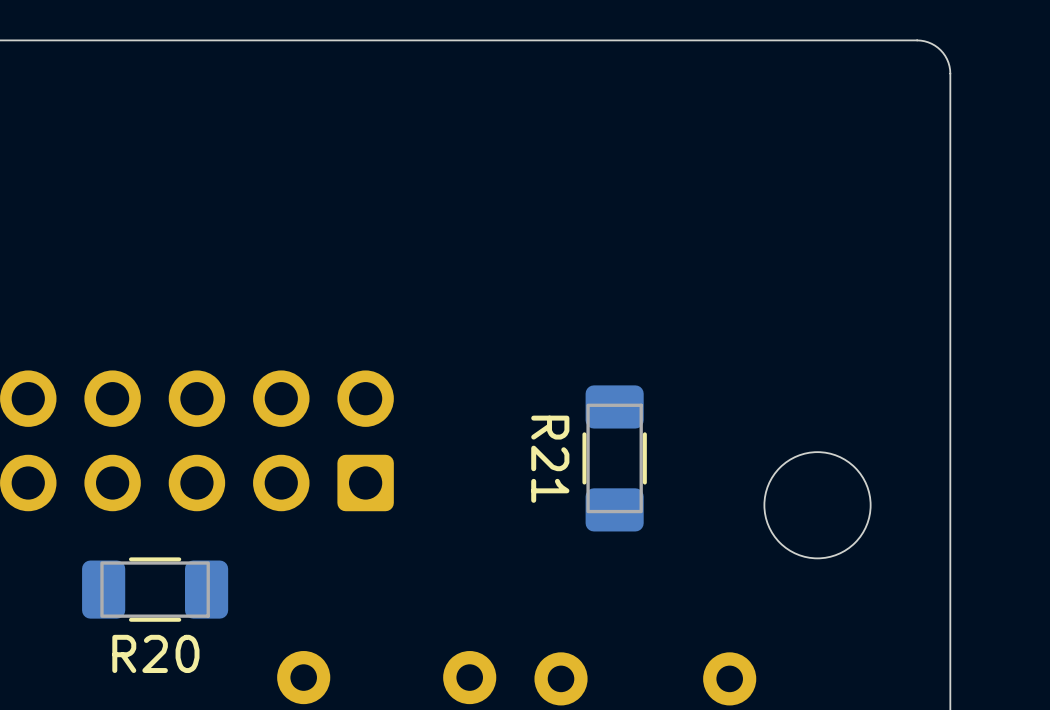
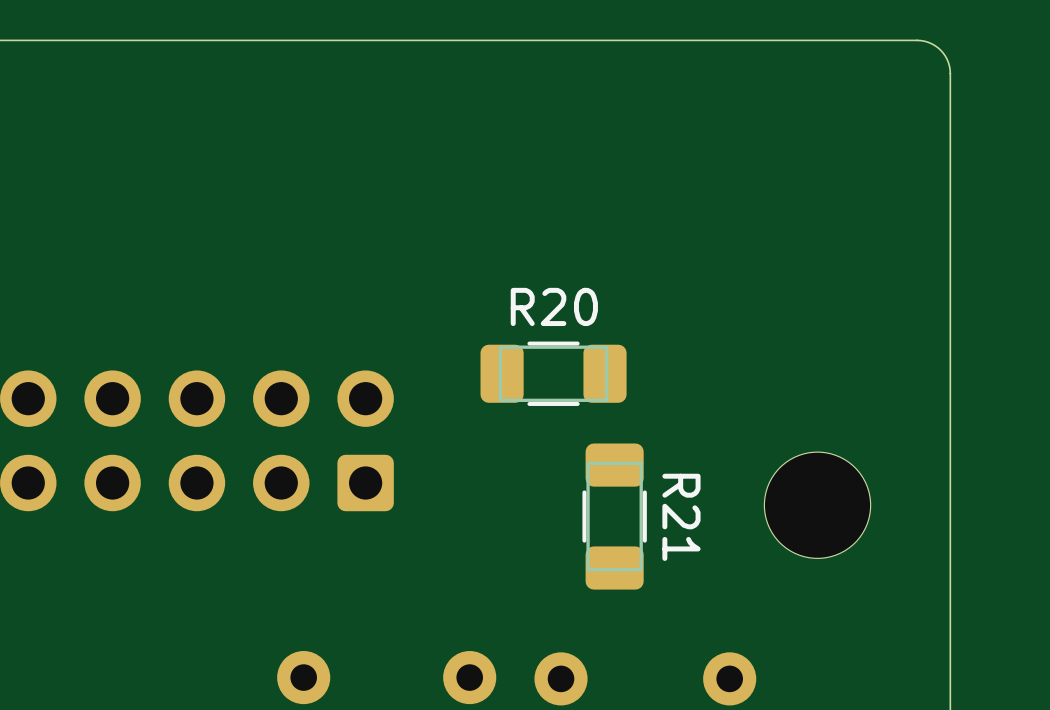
R21 position: (614, 458) -> (614, 516)
R21 name position: R21 (550, 459) -> R21 (681, 517)
R20 position: (155, 589) -> (553, 373)
R20 name position: R20 (155, 653) -> R20 (554, 306)

